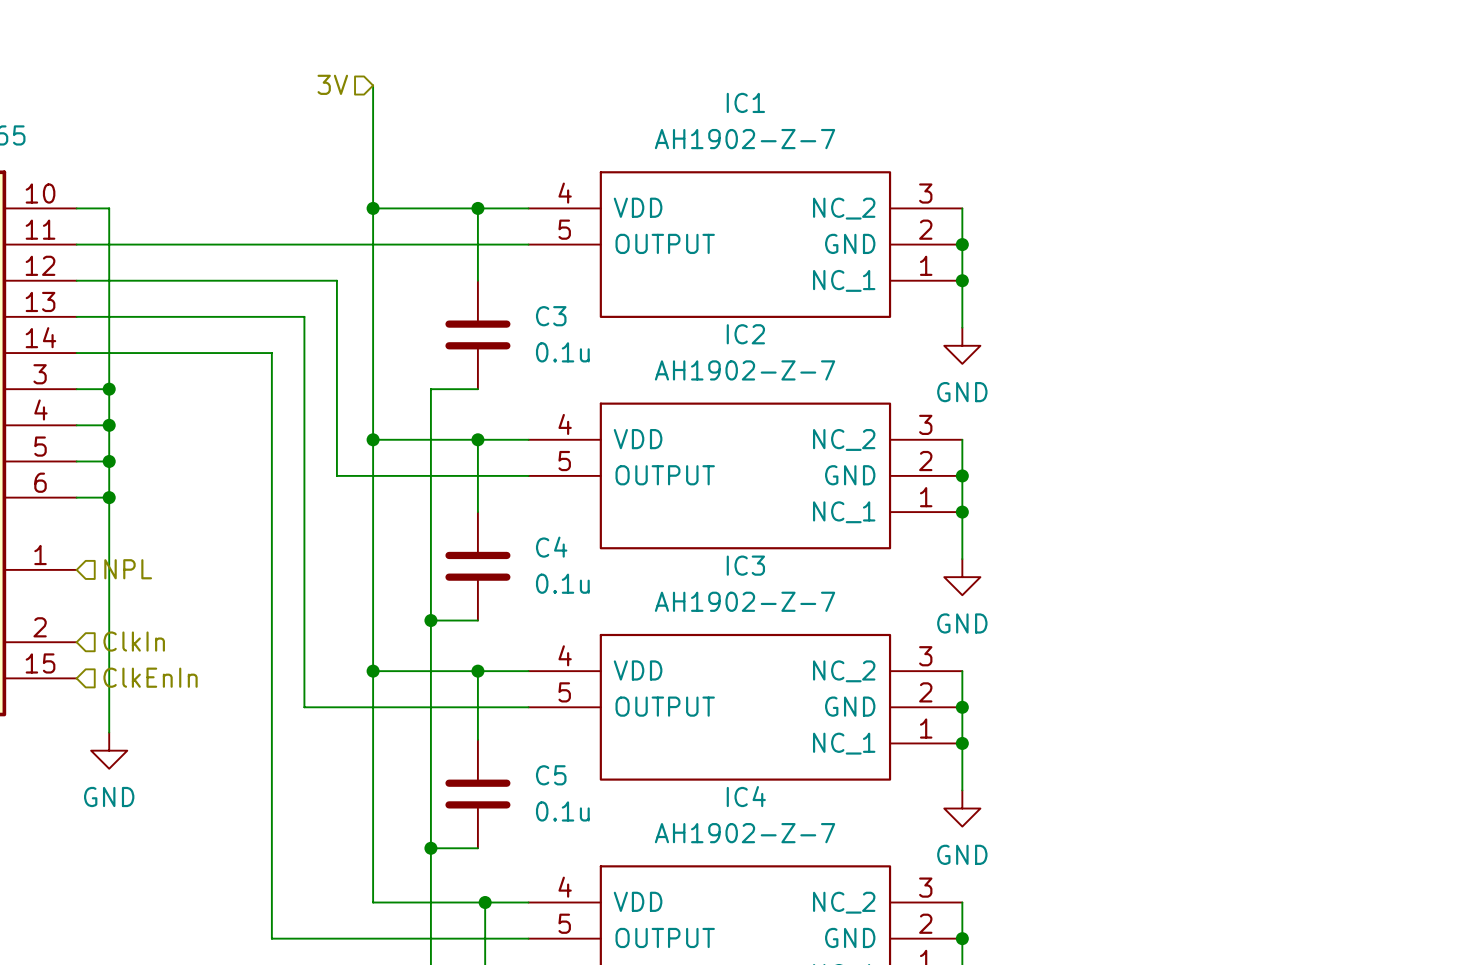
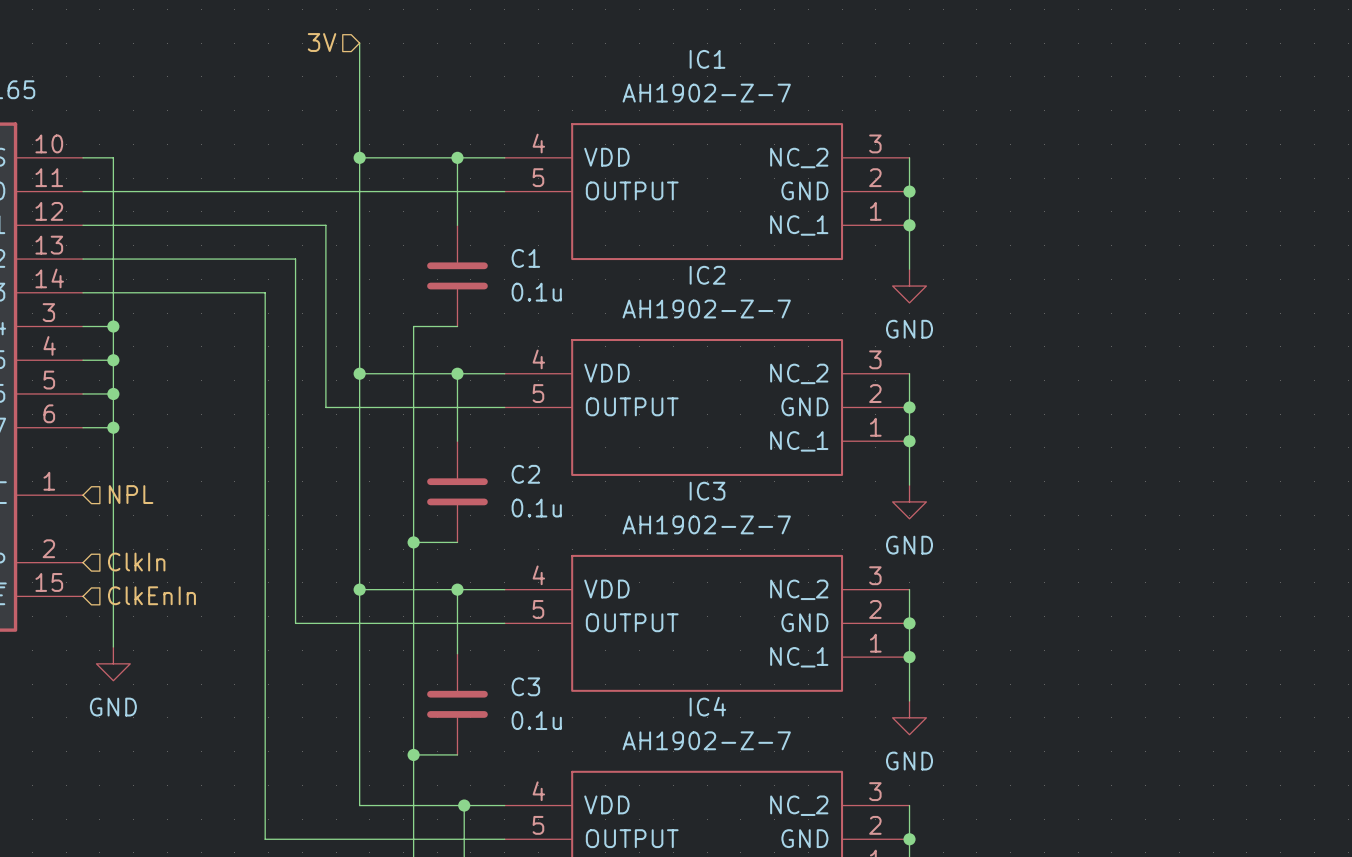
C3 name: C3 (551, 316) -> C1 (525, 258)
C4 name: C4 (551, 547) -> C2 (525, 474)
C5 name: C5 (551, 775) -> C3 (525, 686)

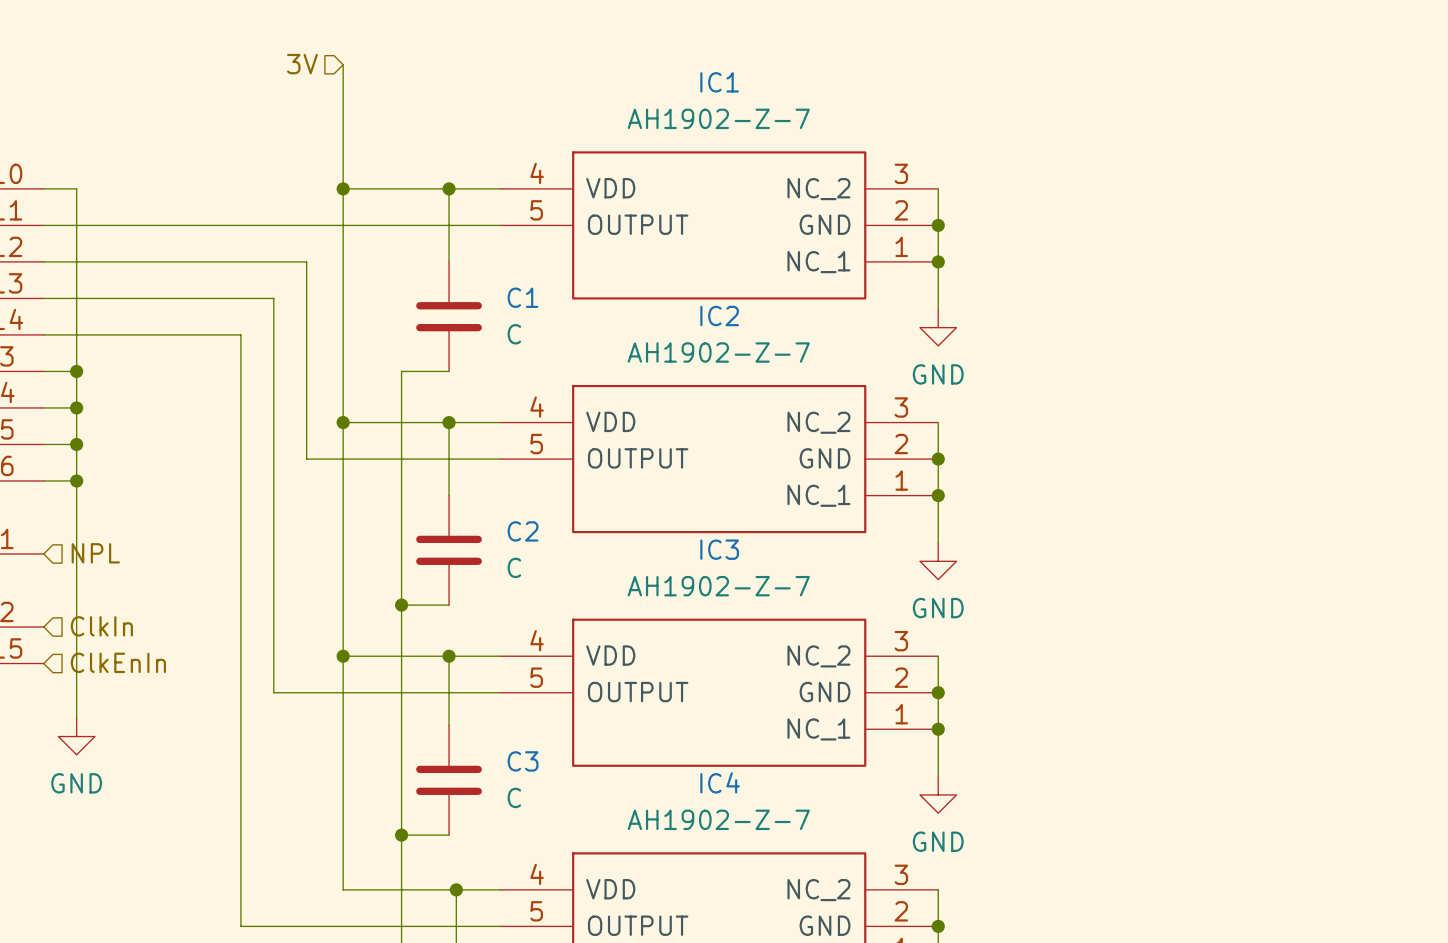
C1 value: 0.1u (536, 292) -> C (514, 334)
C2 value: 0.1u (536, 508) -> C (514, 567)
C3 value: 0.1u (536, 720) -> C (514, 797)

